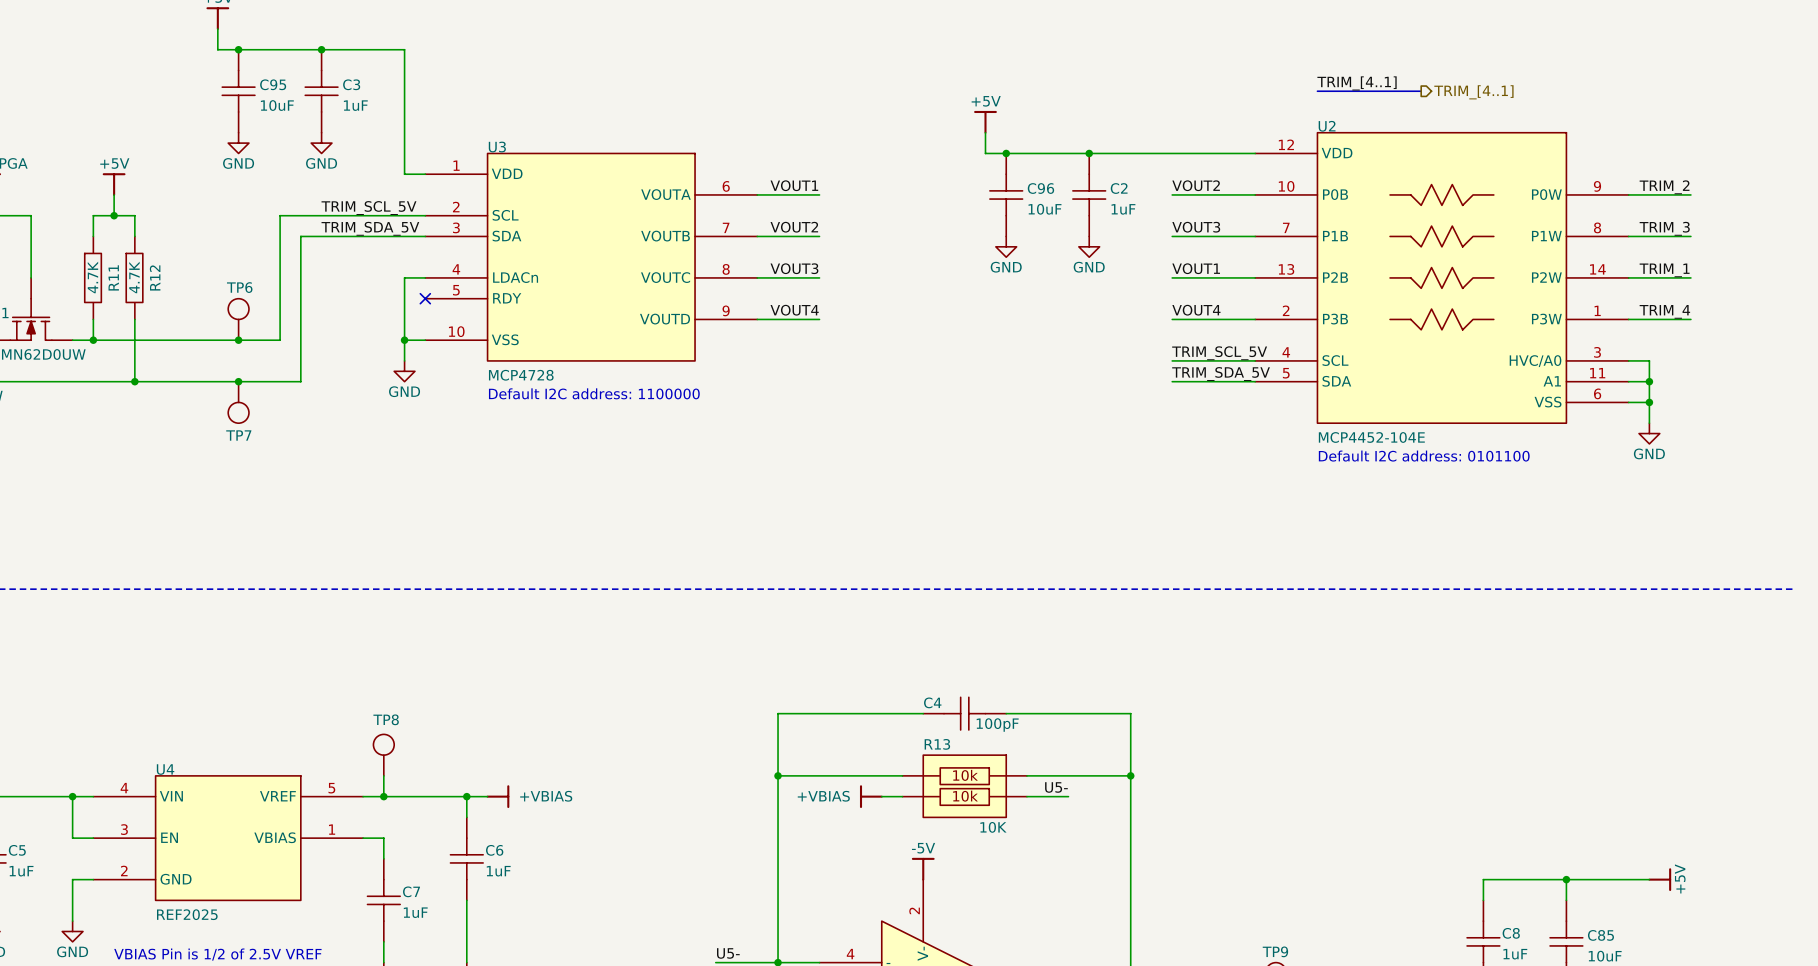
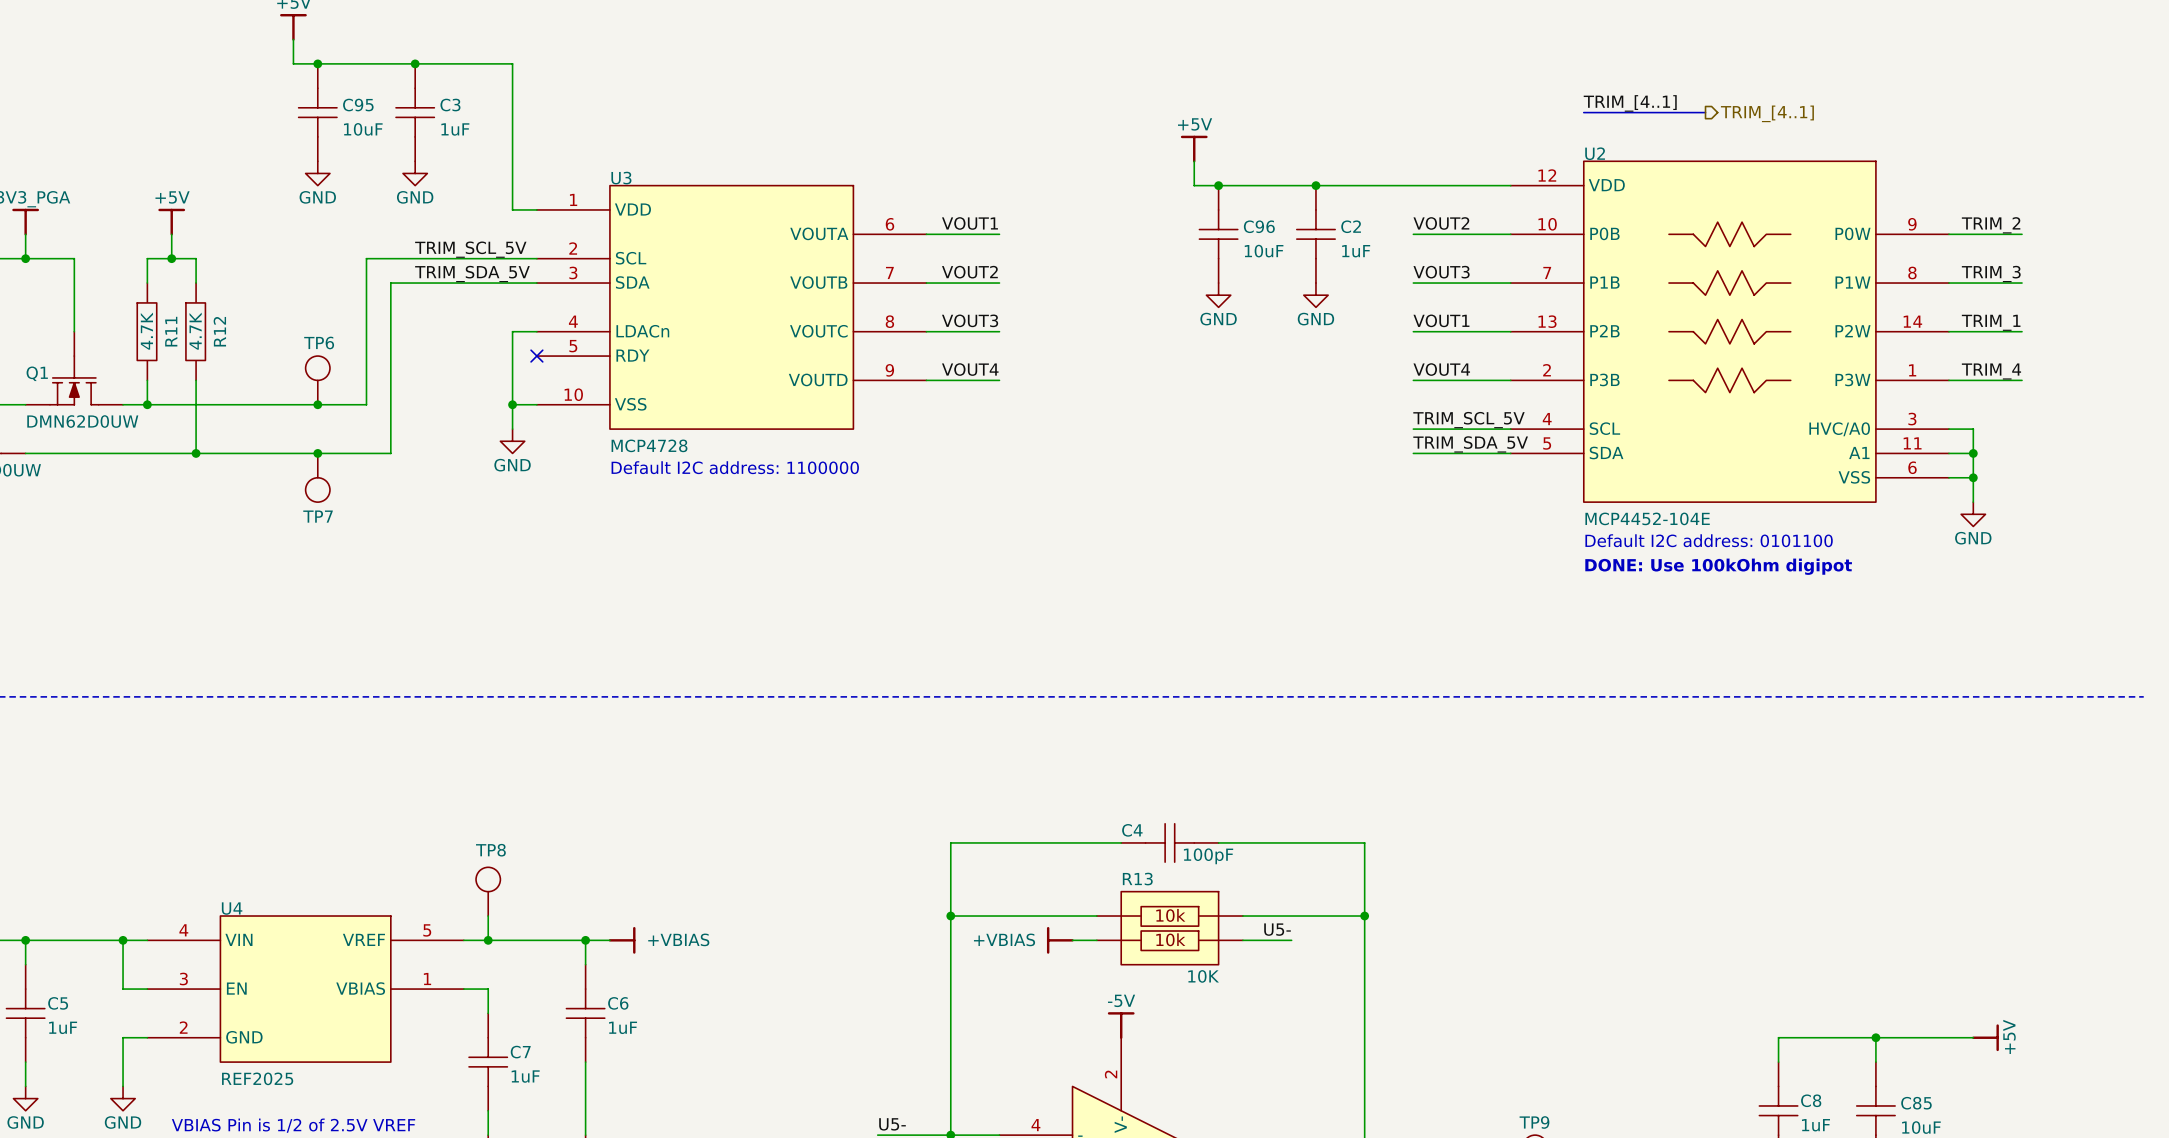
text: none -> DONE: Use 100kOhm digipot (1718, 566)

